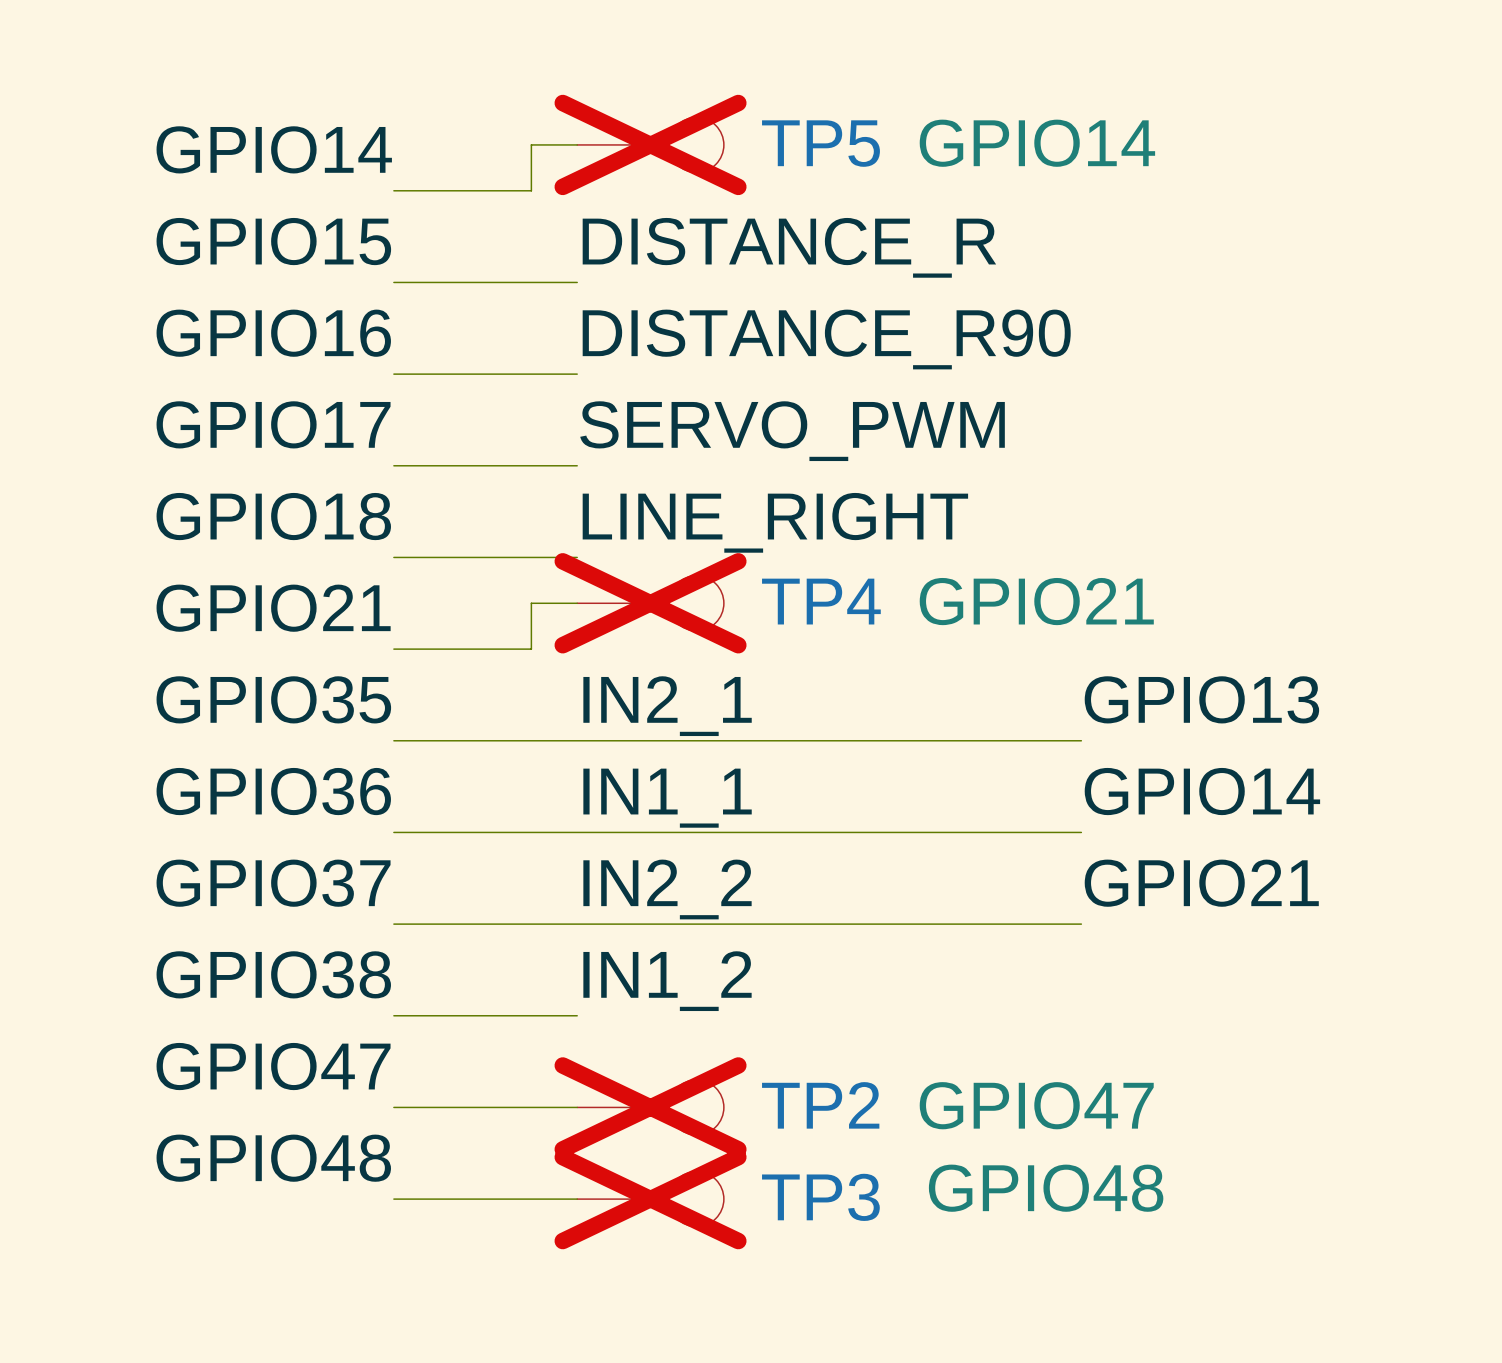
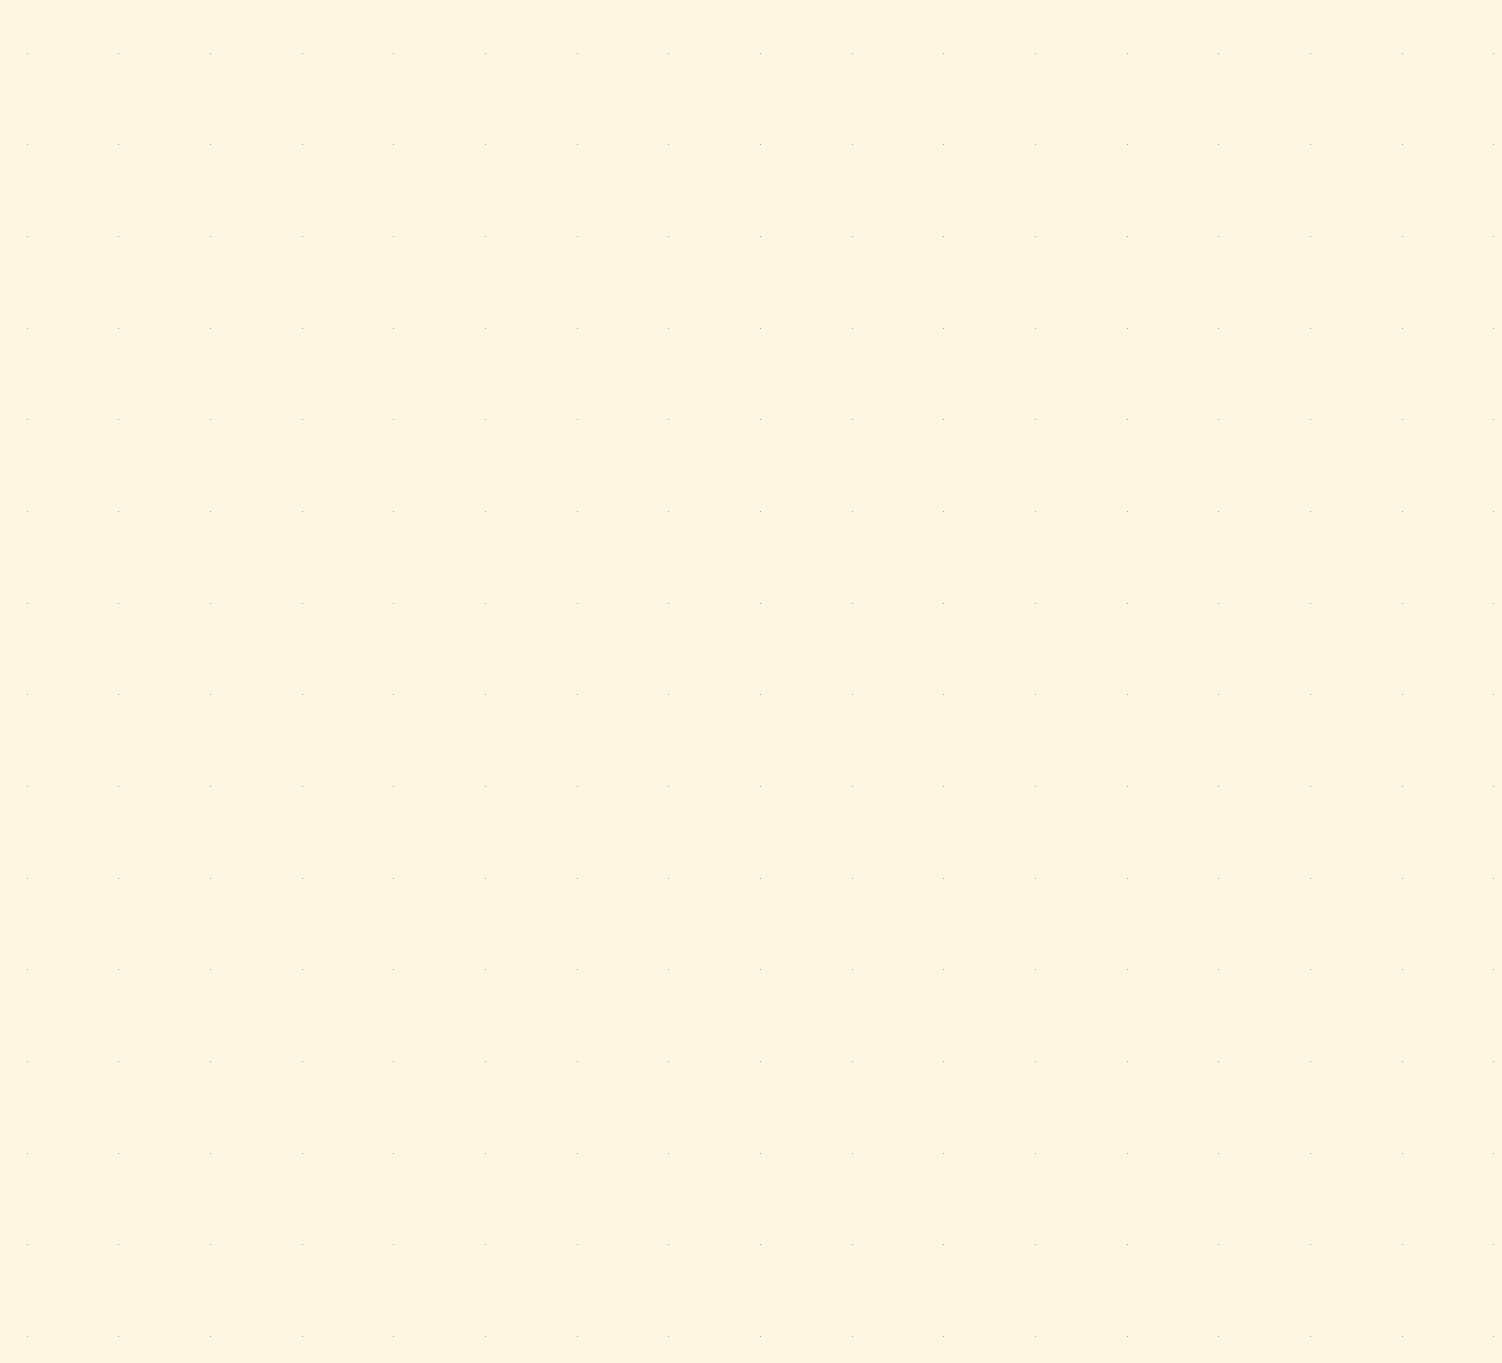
wire: (577, 144) (531, 144) (531, 190) (393, 190) -> none
TP5: GPIO14 (650, 144) -> none
label: GPIO14 (274, 149) -> none
label: GPIO15 (273, 241) -> none
label: DISTANCE_R (789, 247) -> none
wire: (393, 282) (577, 282) -> none
label: GPIO16 (273, 333) -> none
label: DISTANCE_R90 (826, 339) -> none
wire: (393, 374) (577, 374) -> none
label: GPIO17 (273, 424) -> none
label: SERVO_PWM (792, 431) -> none
wire: (393, 465) (577, 465) -> none
label: GPIO18 (273, 516) -> none
label: LINE_RIGHT (775, 522) -> none
wire: (393, 557) (577, 557) -> none
wire: (577, 603) (531, 603) (531, 649) (393, 649) -> none
TP4: GPIO21 (650, 603) -> none
label: GPIO21 (273, 608) -> none
label: GPIO35 (273, 699) -> none
label: GPIO13 (1201, 699) -> none
label: IN2_1 (667, 706) -> none
wire: (393, 740) (1081, 740) -> none
label: GPIO36 (273, 791) -> none
label: GPIO14 (1202, 791) -> none
label: IN1_1 (667, 798) -> none
wire: (393, 832) (1081, 832) -> none
label: GPIO37 (273, 883) -> none
label: GPIO21 (1201, 883) -> none
label: IN2_2 (667, 889) -> none
wire: (393, 924) (1081, 924) -> none
label: GPIO38 (273, 974) -> none
label: IN1_2 (667, 981) -> none
wire: (393, 1015) (577, 1015) -> none
label: GPIO47 (273, 1066) -> none
wire: (393, 1107) (577, 1107) -> none
TP2: GPIO47 (650, 1107) -> none
label: GPIO48 (273, 1158) -> none
wire: (393, 1199) (577, 1199) -> none
TP3: GPIO48 (650, 1199) -> none

